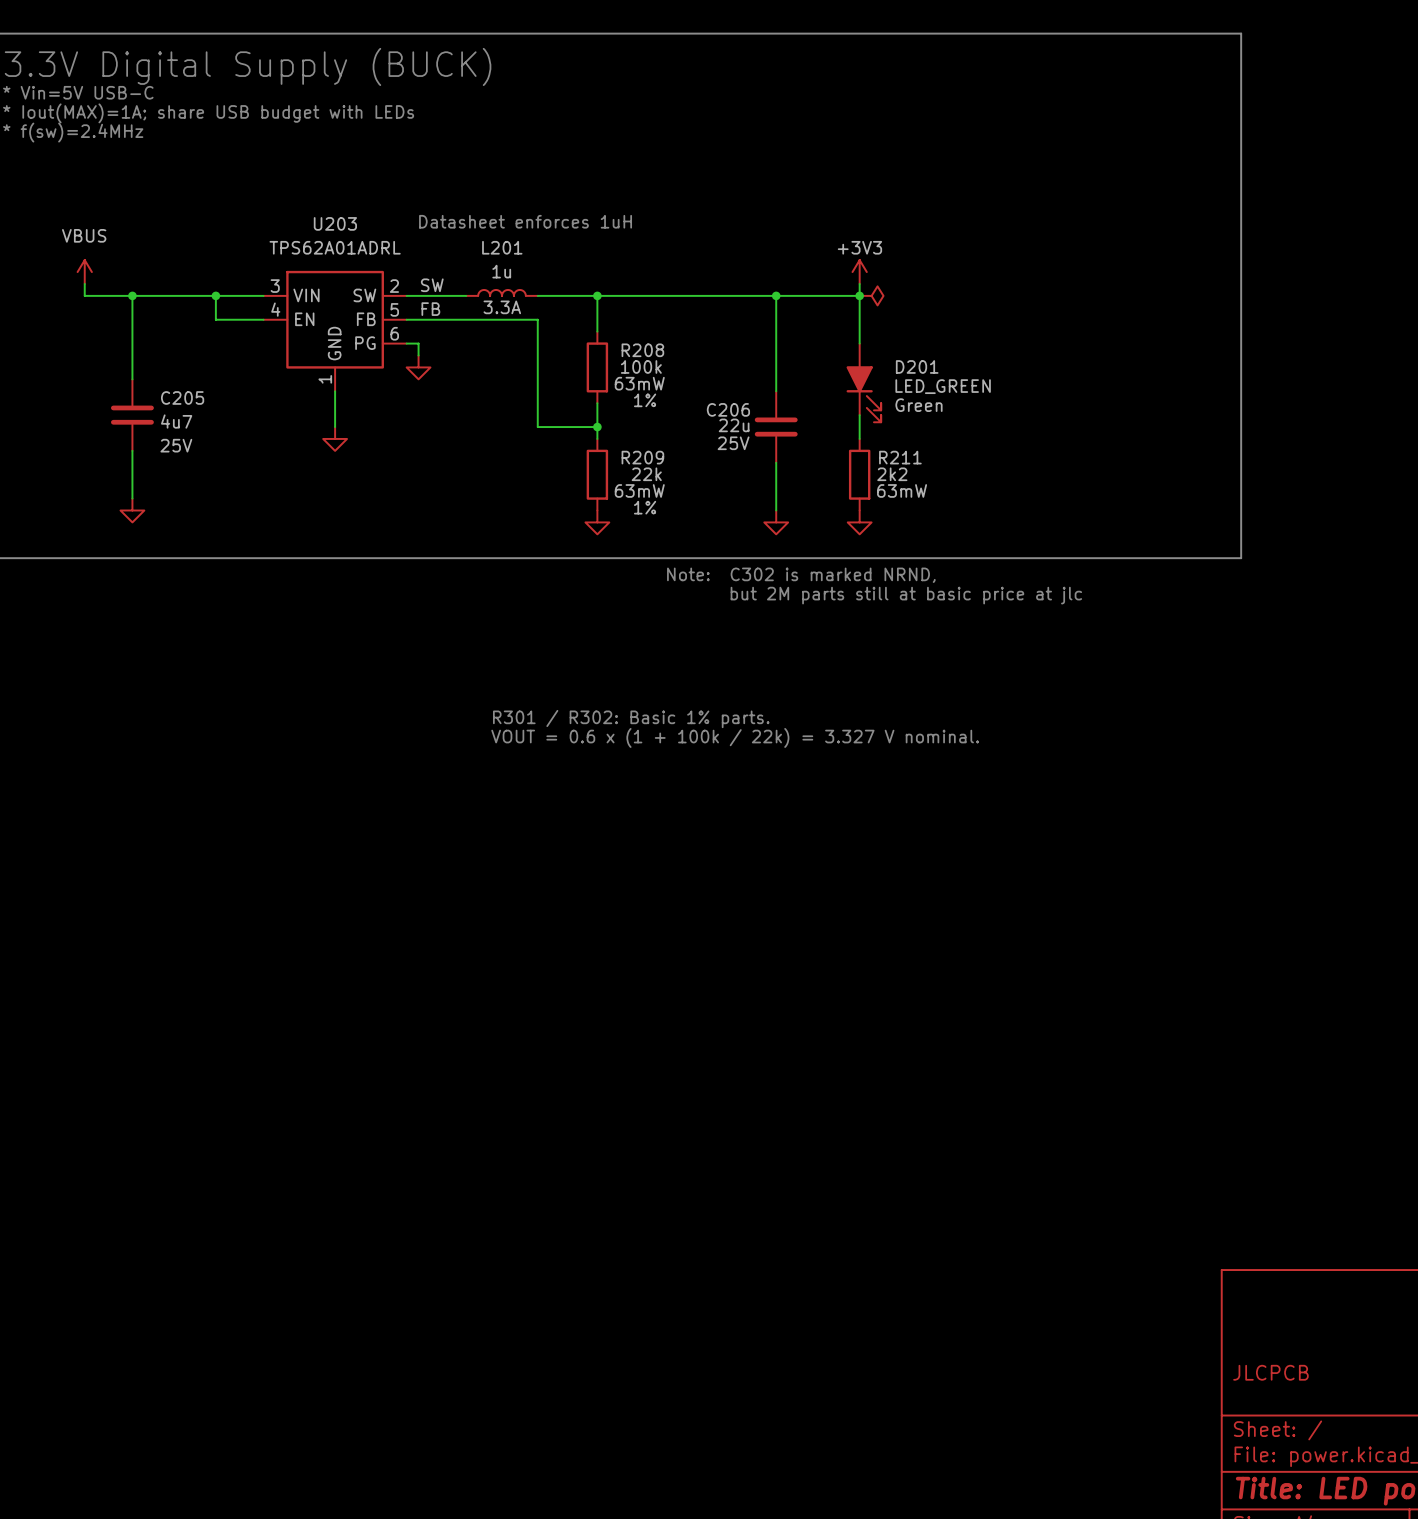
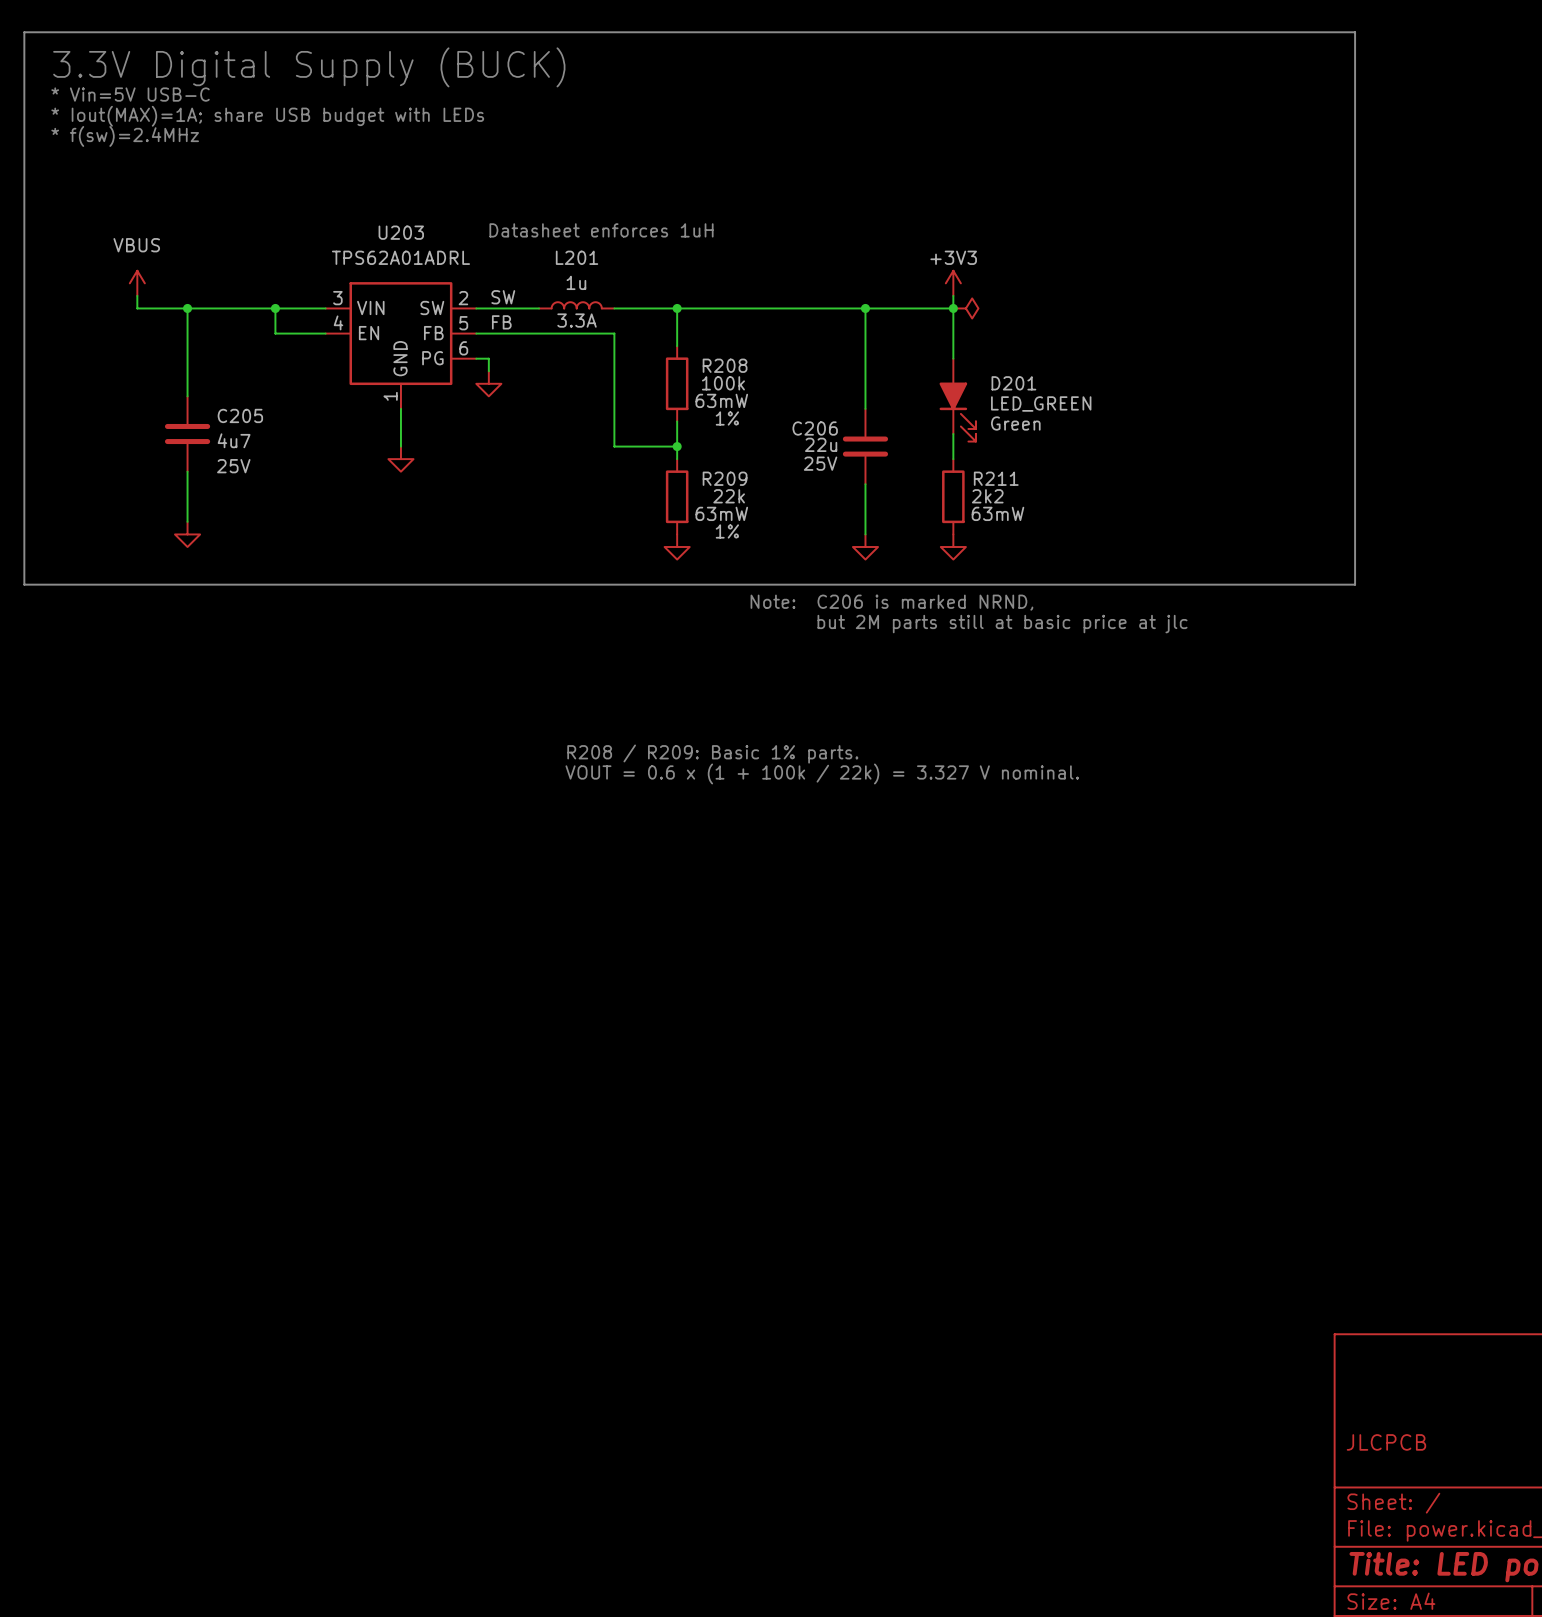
text: Note: C302 is marked NRND, (801, 575) -> Note: C206 is marked NRND, (891, 602)
text: R301 / R302: Basic 1% parts. (631, 719) -> R208 / R209: Basic 1% parts. (712, 754)

